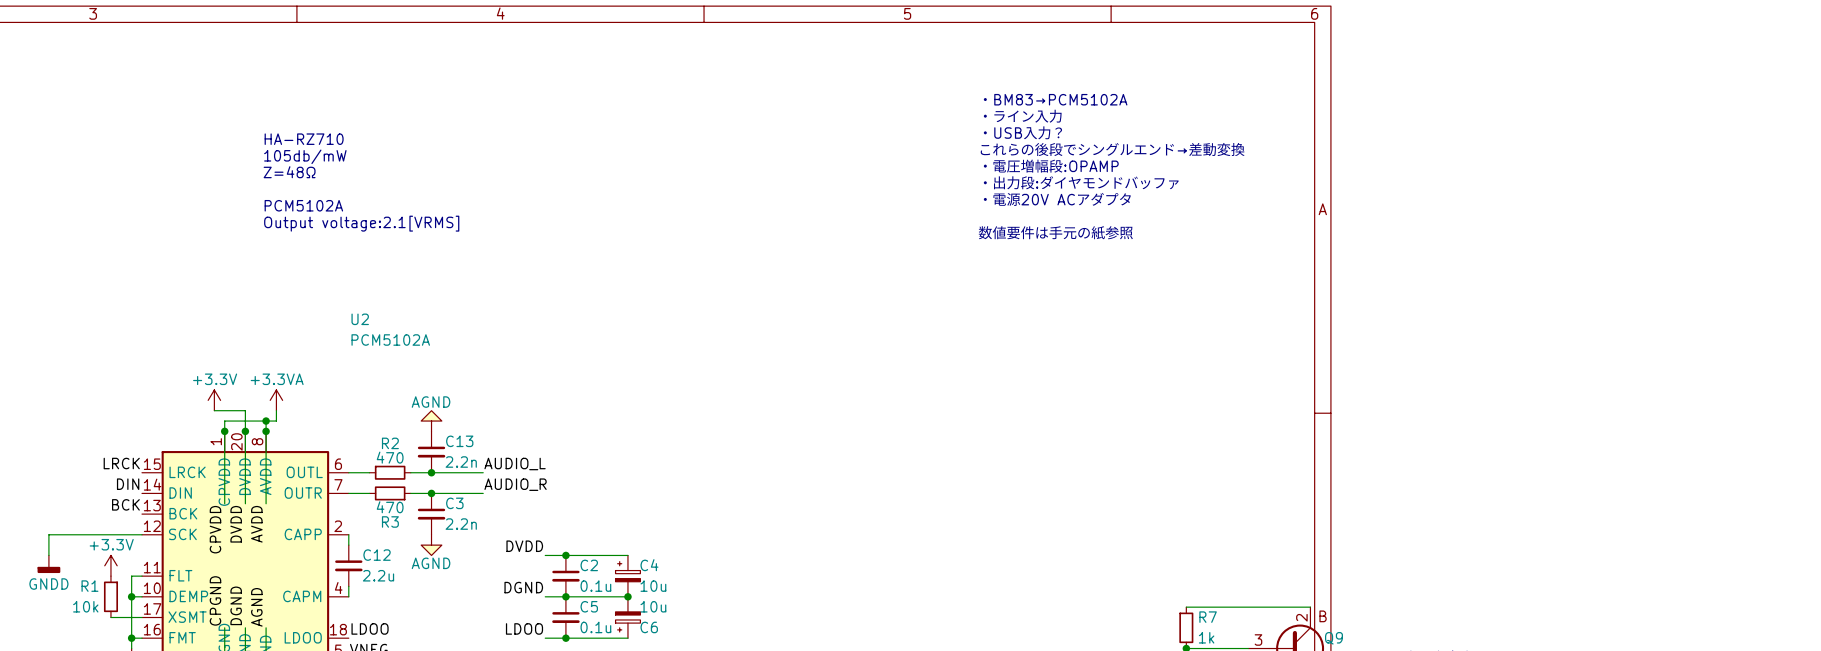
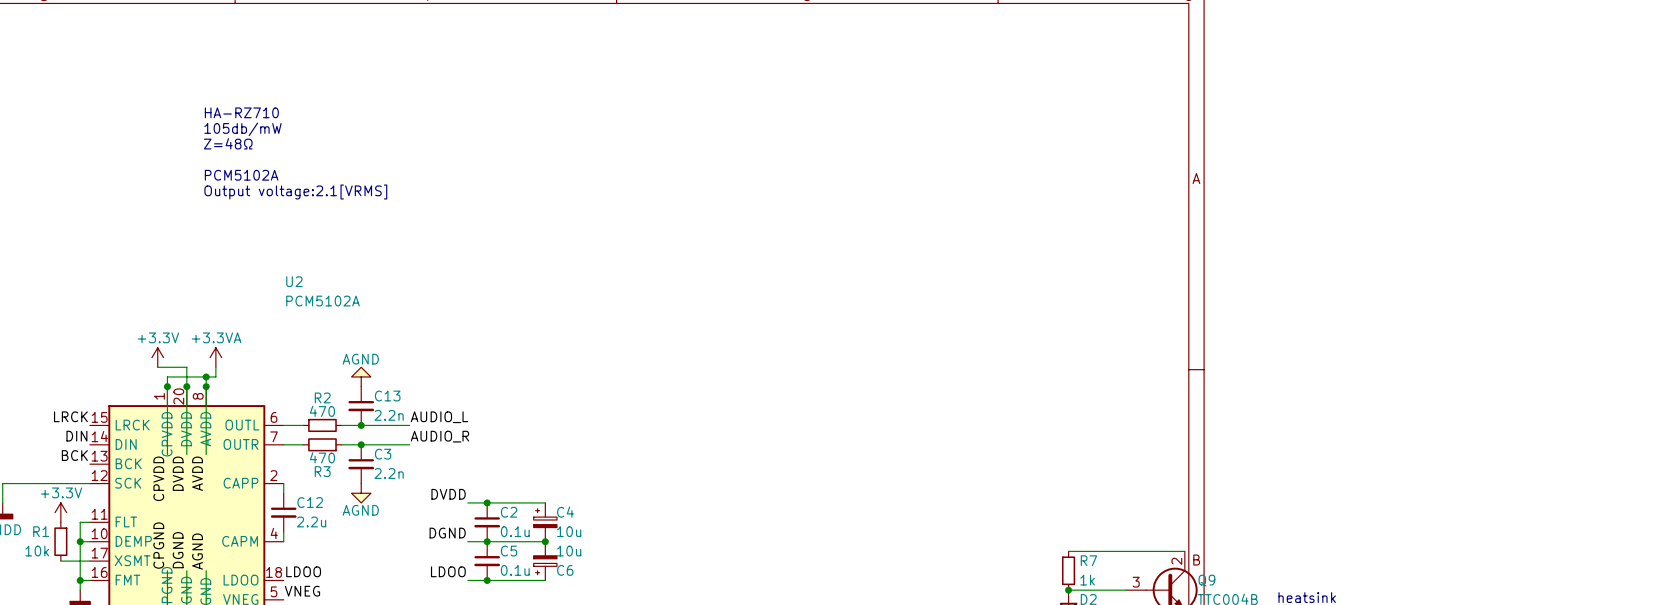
text: ・BM83→PCM5102A (1055, 99) -> none
text: ・ライン入力 (1022, 116) -> none
text: ・USB入力？ (1022, 132) -> none
text: これらの後段でシングルエンド→差動変換 (1112, 149) -> none
text: ・電圧増幅段:OPAMP (1050, 166) -> none
text: ・出力段:ダイヤモンドバッファ (1081, 182) -> none
text: ・電源20V ACアダプタ (1057, 199) -> none
text: 数値要件は手元の紙参照 (1055, 232) -> none

